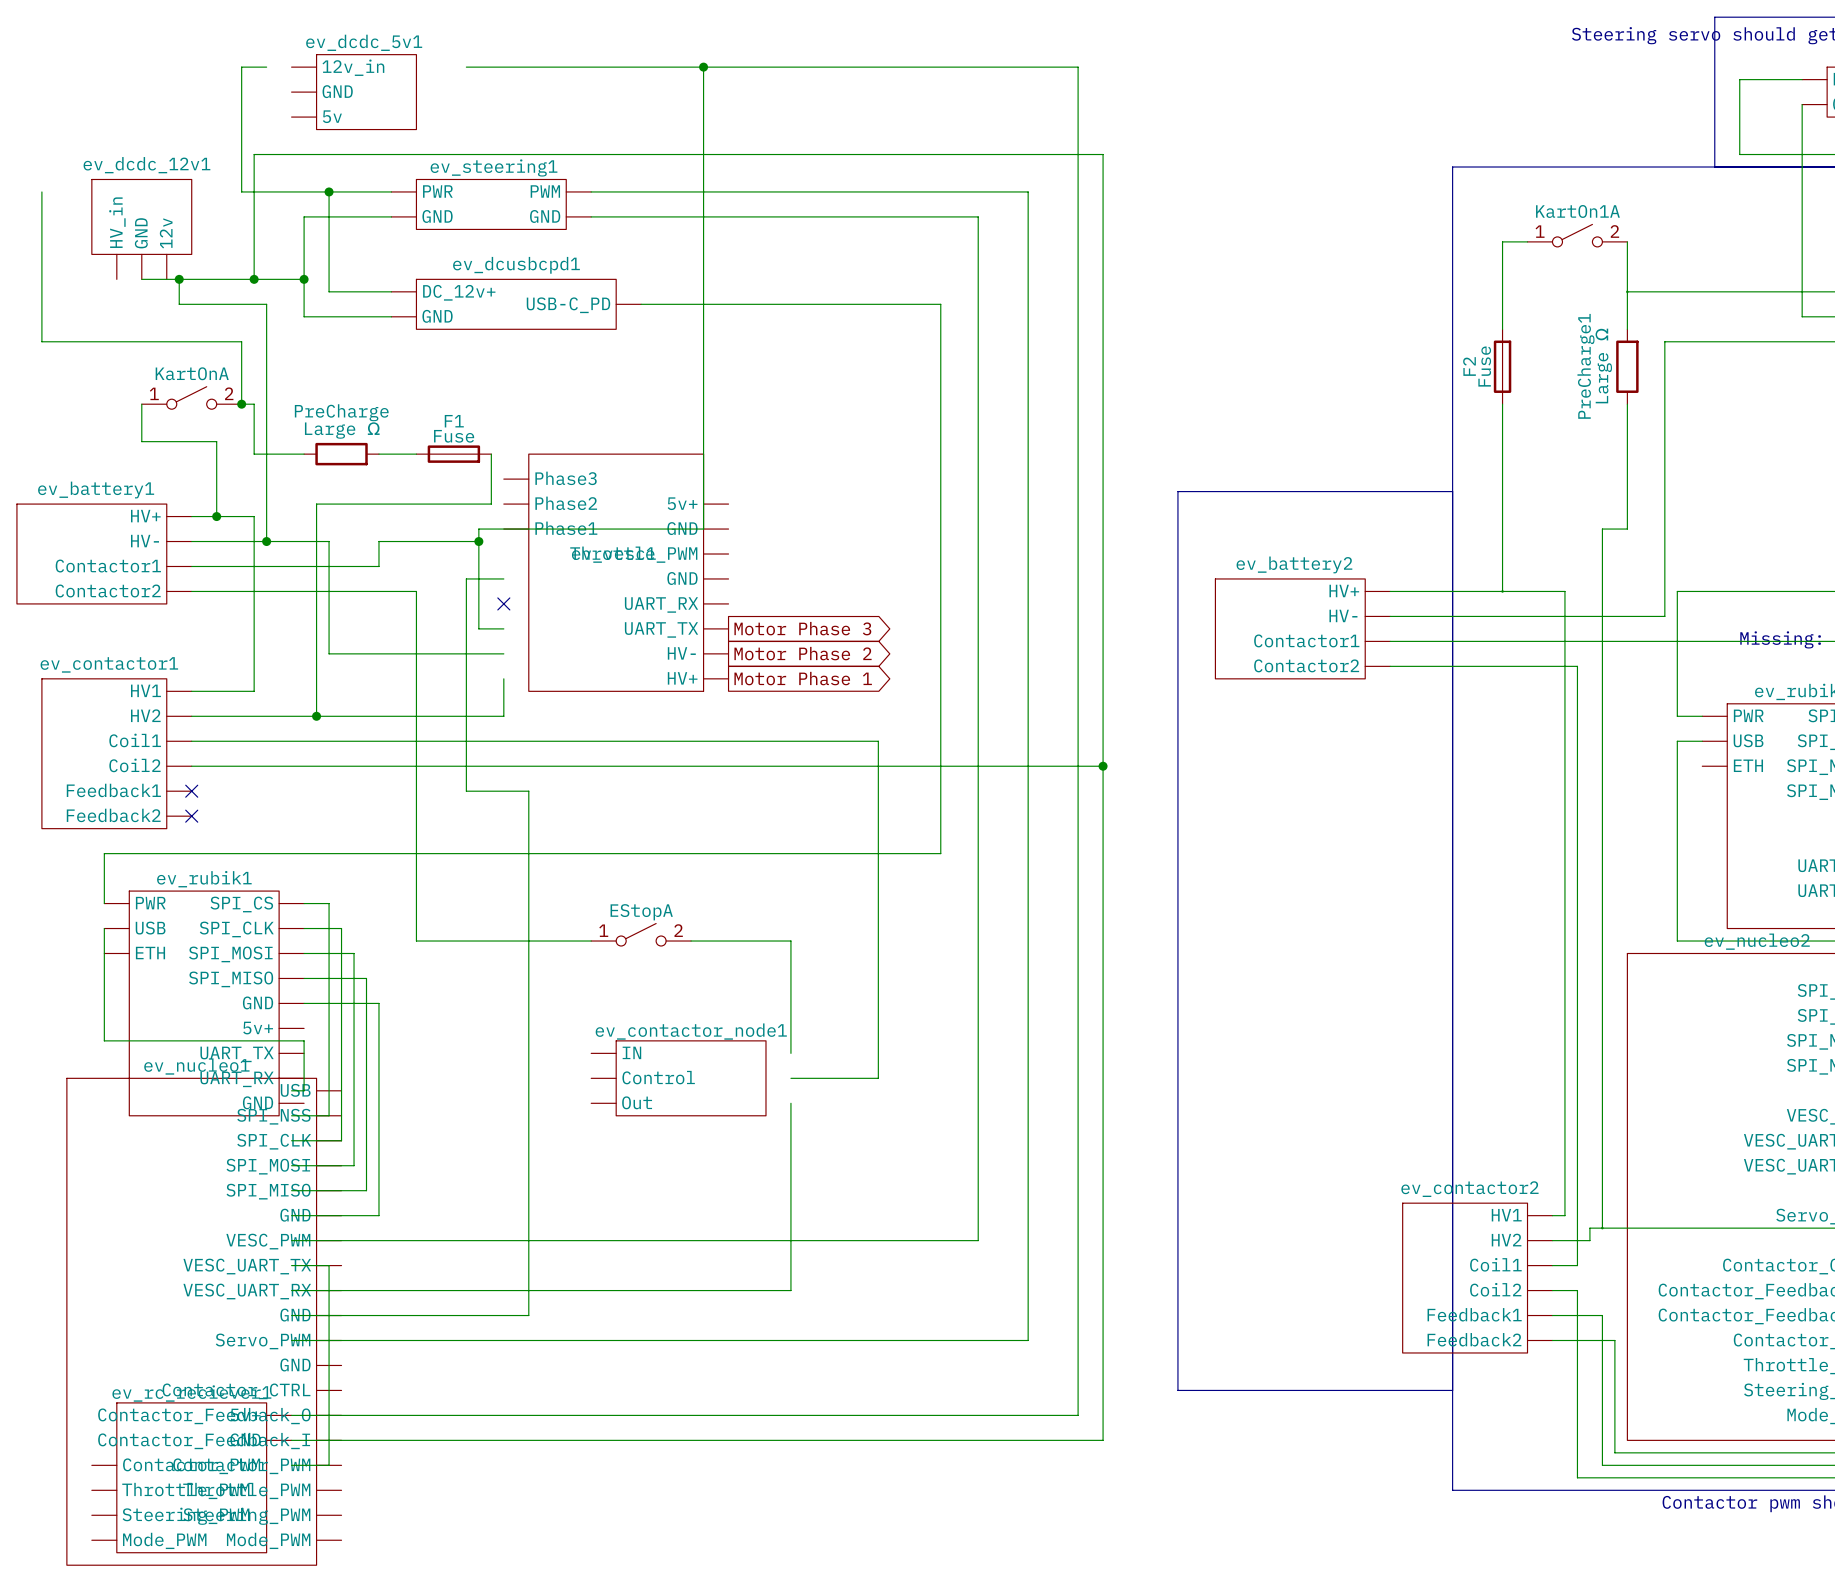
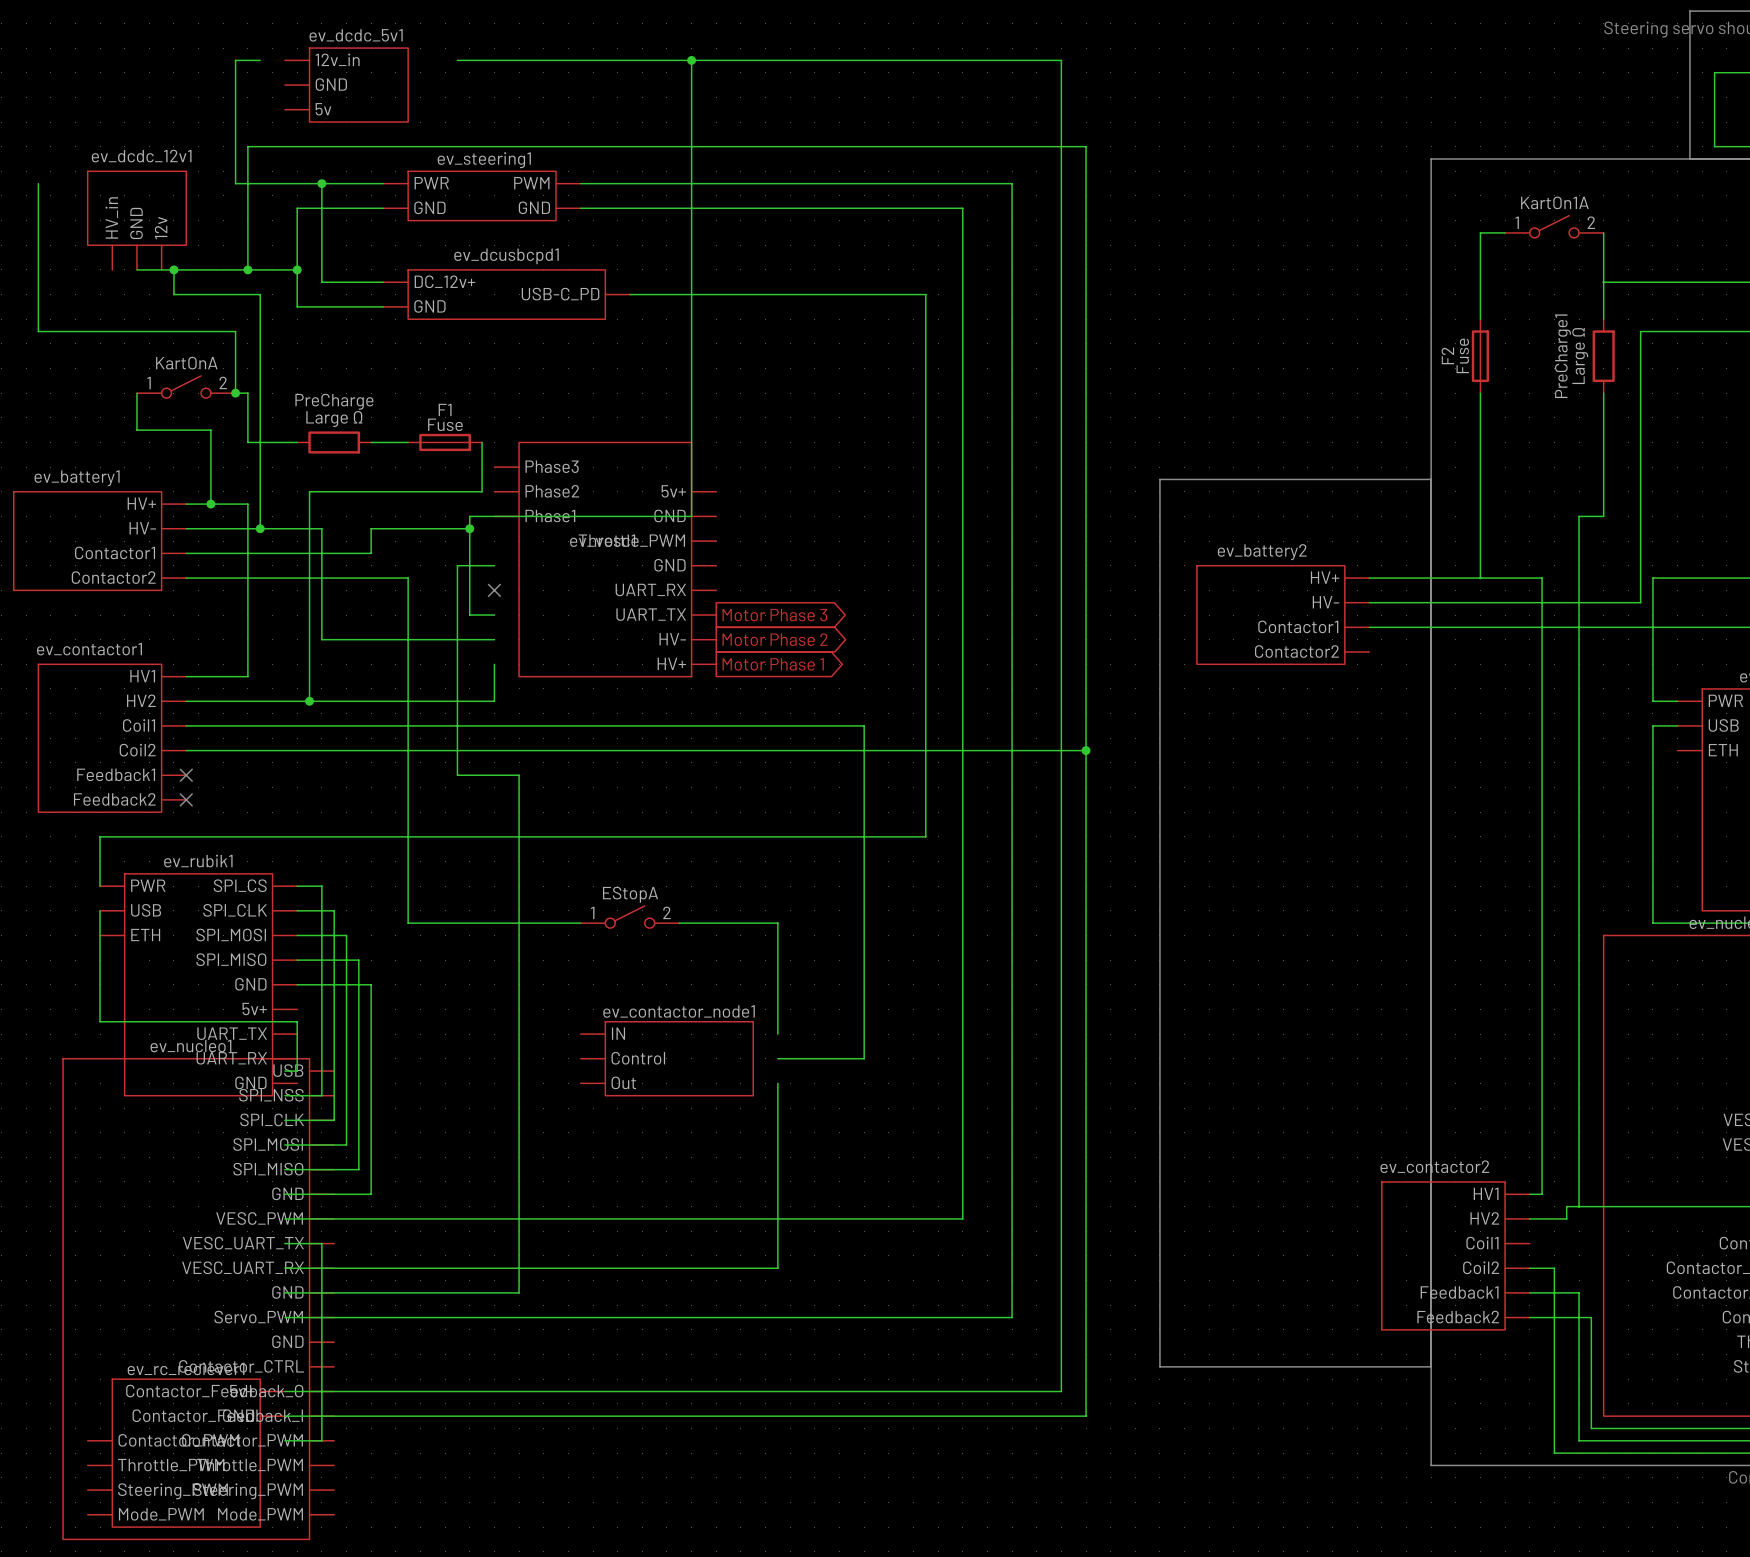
wire: (1390, 666) (1577, 666) (1577, 1265) (1552, 1265) -> none

